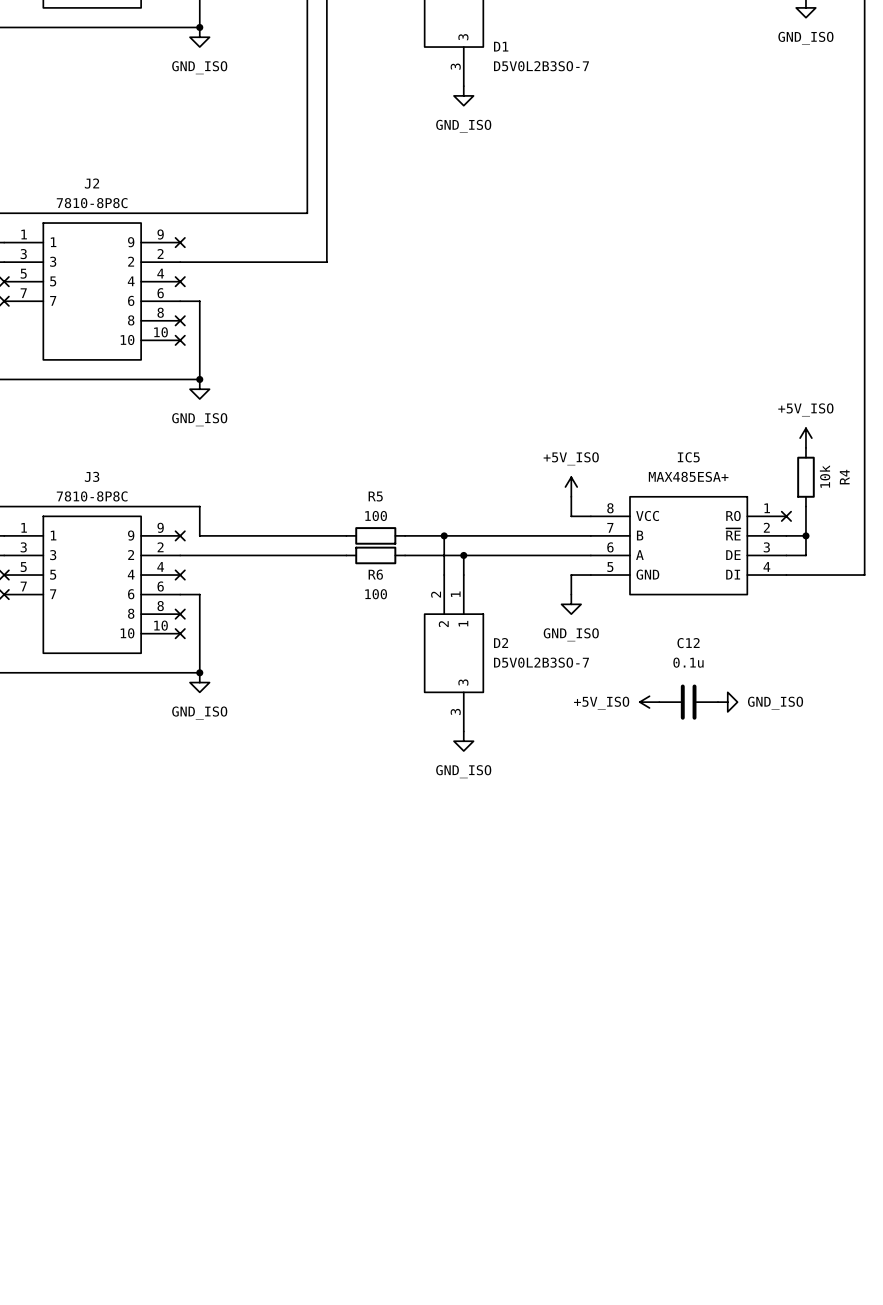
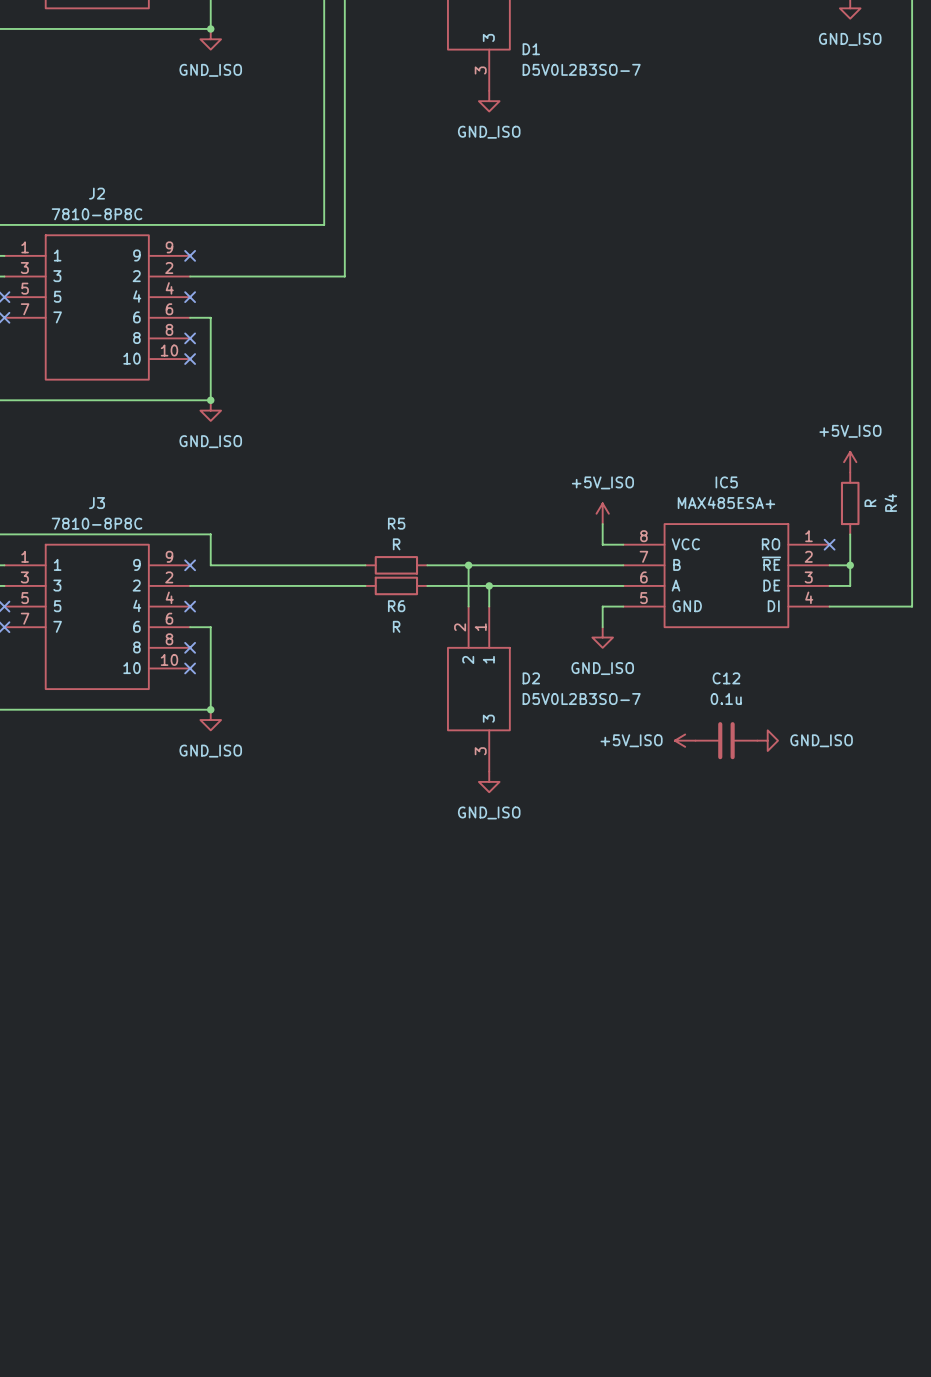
R4 value: 10k (825, 476) -> R (870, 503)
R5 value: 100 (376, 515) -> R (396, 544)
R6 value: 100 (376, 594) -> R (396, 626)

